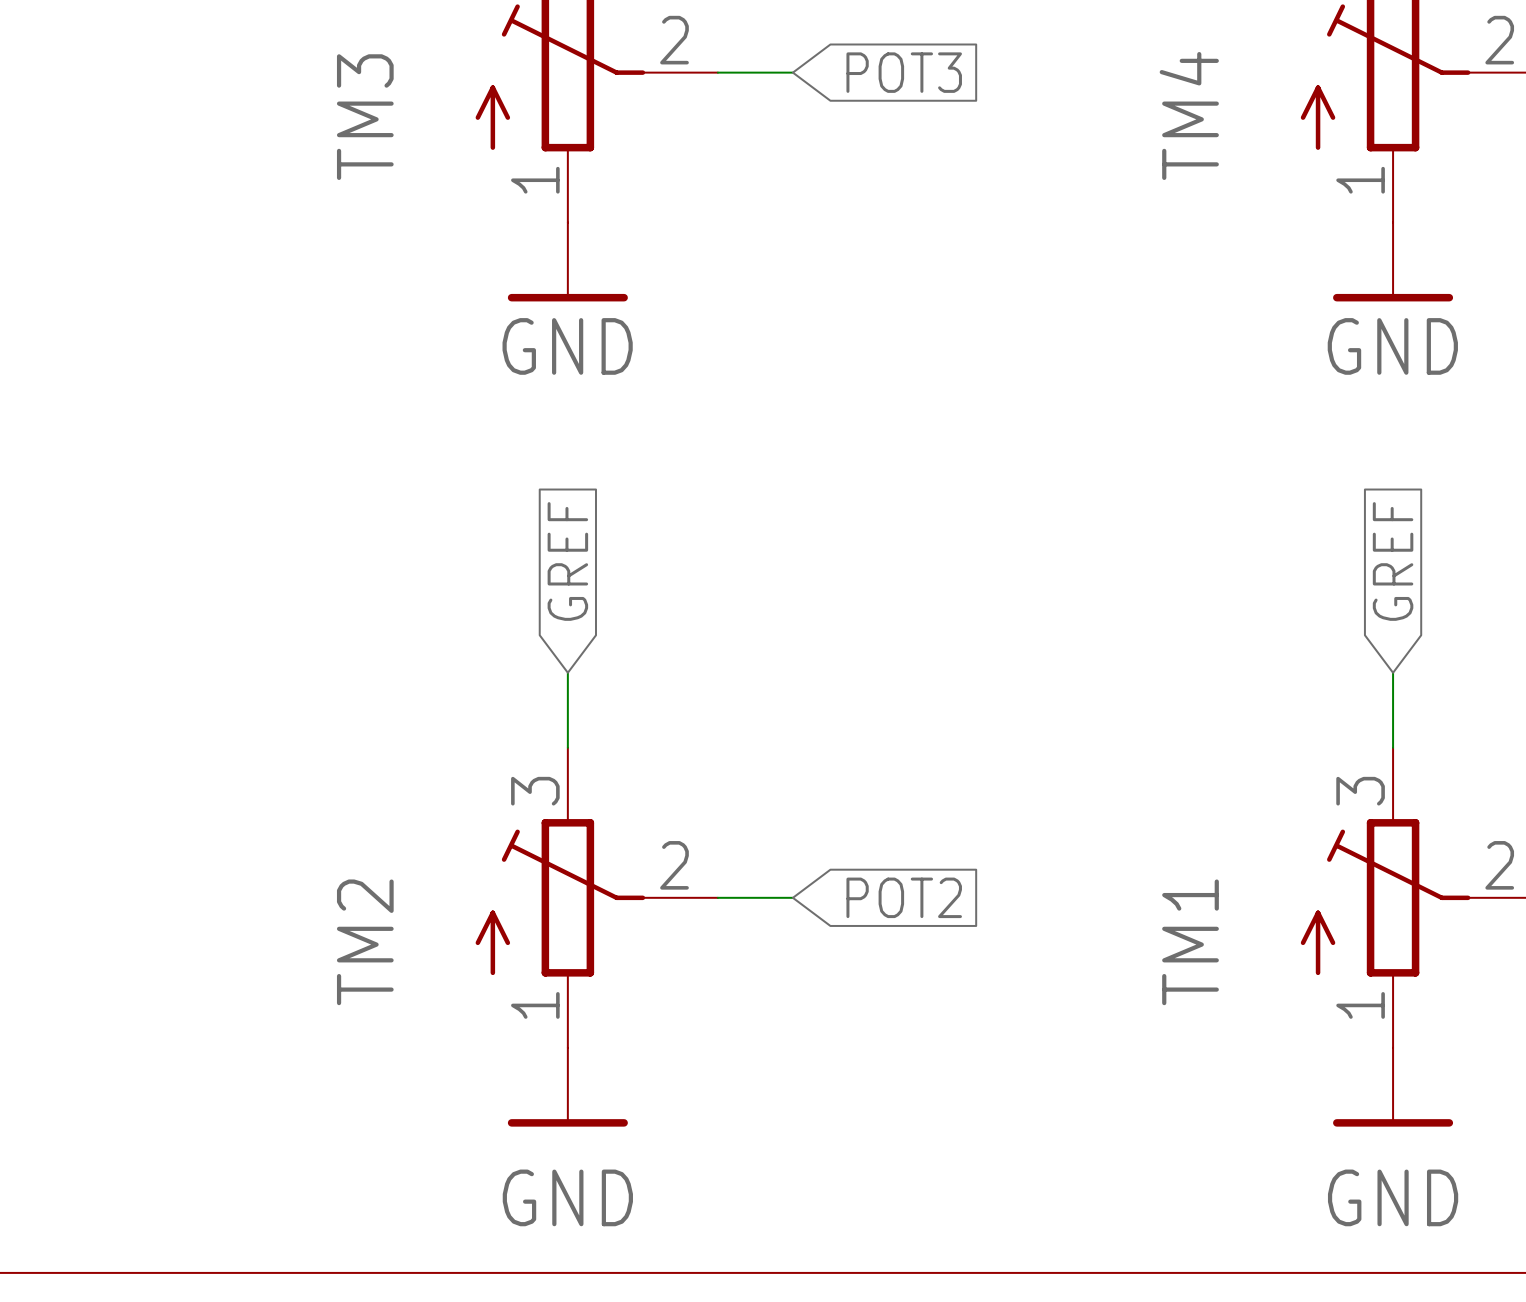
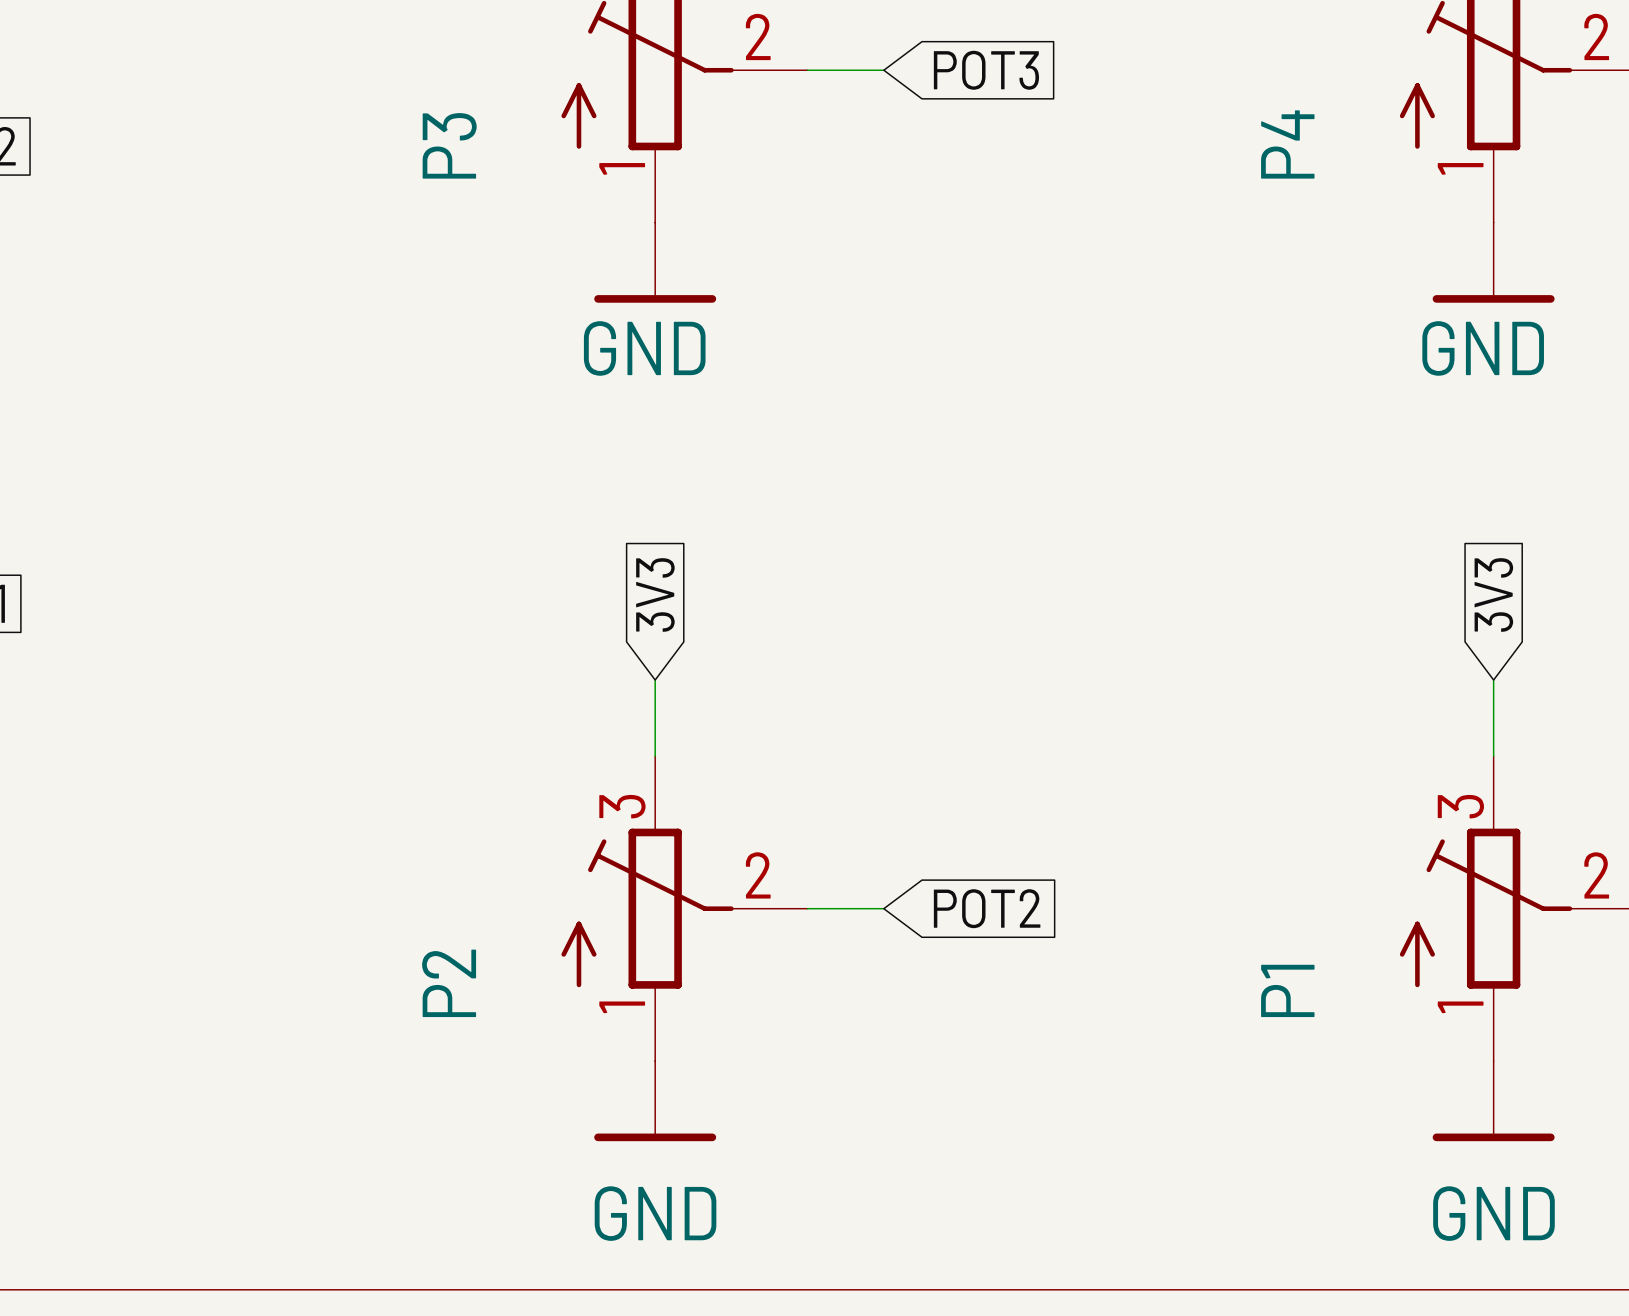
TM4 name: TM4 (1189, 115) -> P4 (1287, 144)
TM3 name: TM3 (365, 117) -> P3 (449, 145)
global label: GREF (567, 561) -> 3V3 (655, 594)
global label: GREF (1393, 561) -> 3V3 (1493, 594)
TM2 name: TM2 (365, 942) -> P2 (449, 983)
TM1 name: TM1 (1190, 942) -> P1 (1287, 990)

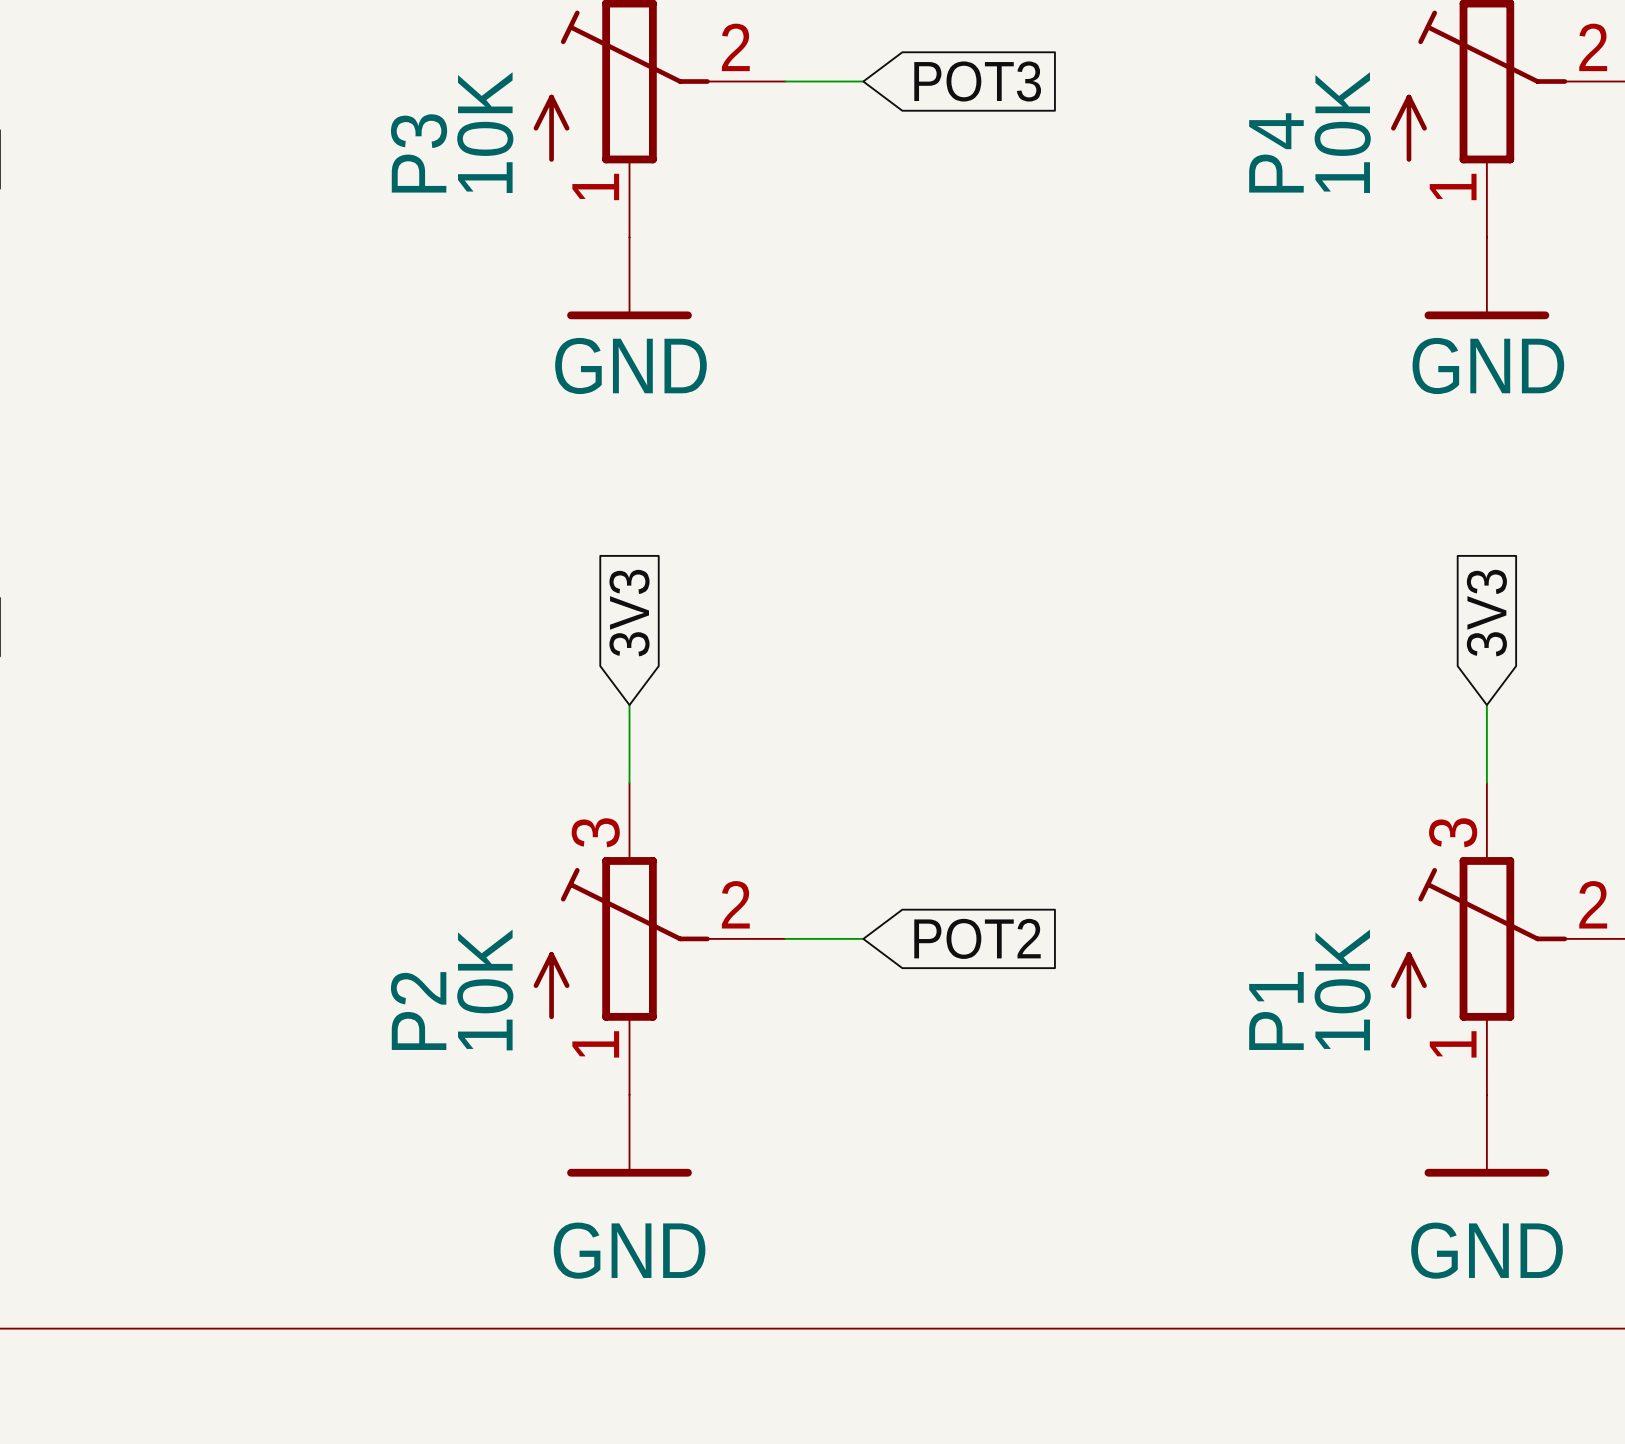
P3 value: none -> 10K (485, 132)
P4 value: none -> 10K (1342, 132)
P2 value: none -> 10K (485, 990)
P1 value: none -> 10K (1342, 990)

